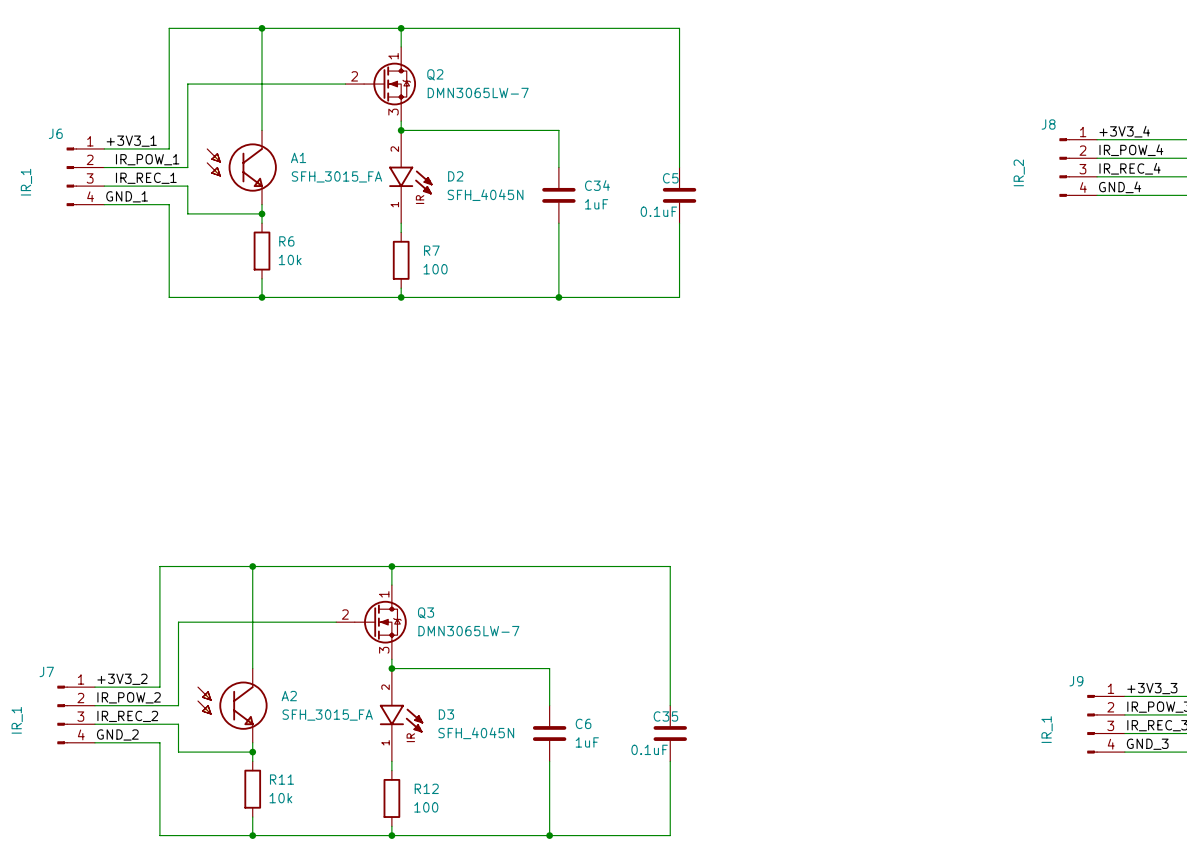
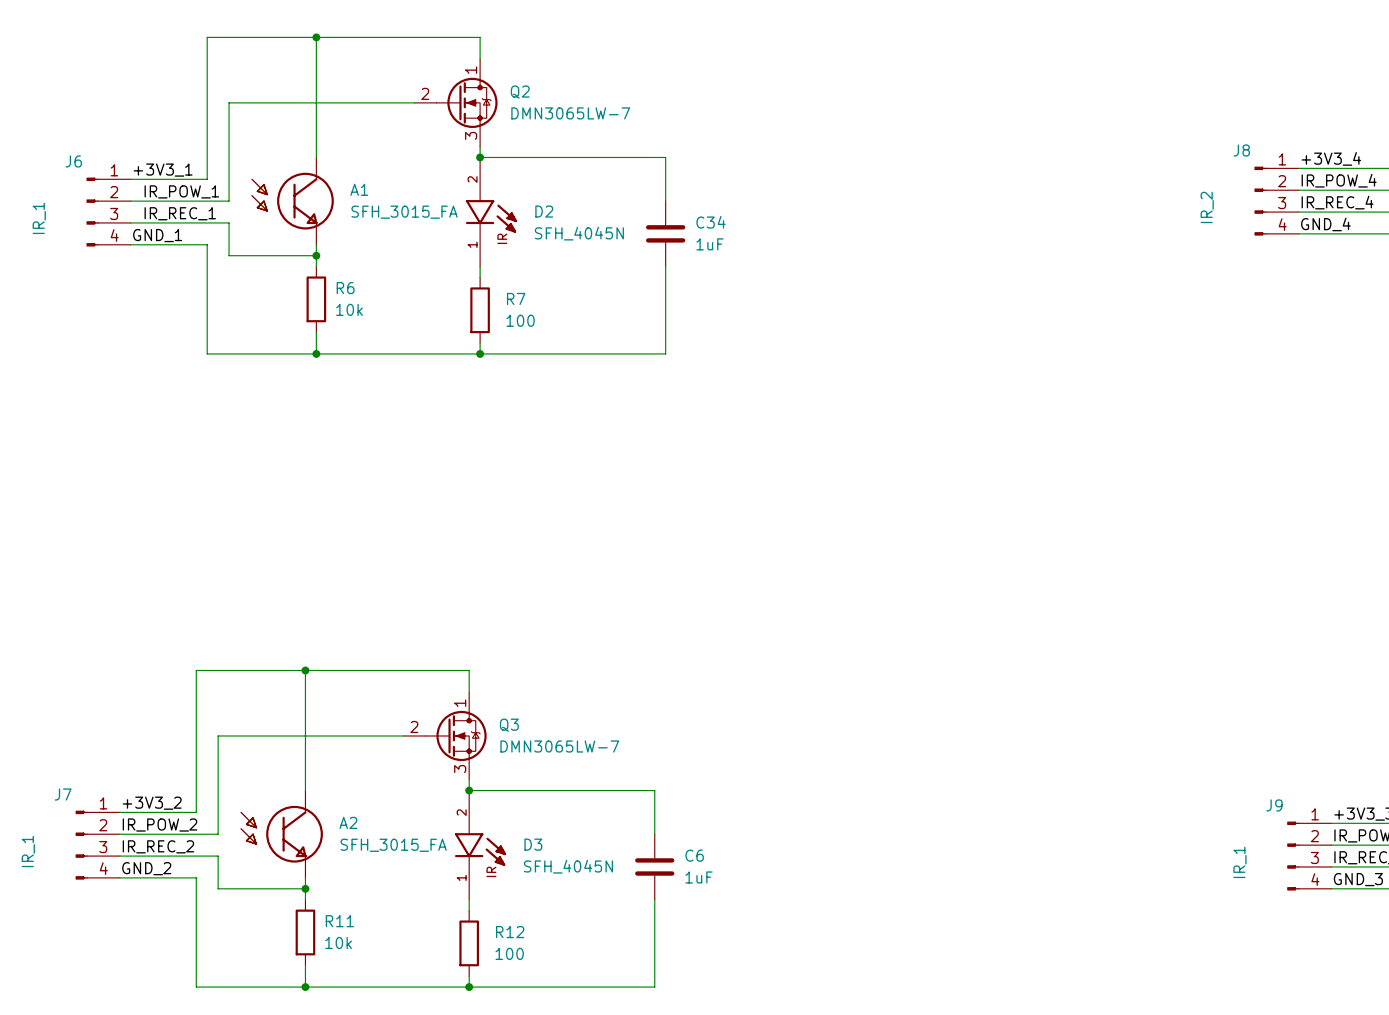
wire: (401, 28) (679, 28) (679, 167) -> none
junction: (401, 28) -> none
C5: 0.1uF (679, 195) -> none
wire: (679, 223) (679, 297) (558, 297) -> none
junction: (558, 297) -> none
wire: (391, 566) (670, 566) (670, 705) -> none
junction: (391, 566) -> none
C35: 0.1uF (670, 733) -> none
wire: (670, 761) (670, 835) (549, 835) -> none
junction: (549, 835) -> none

